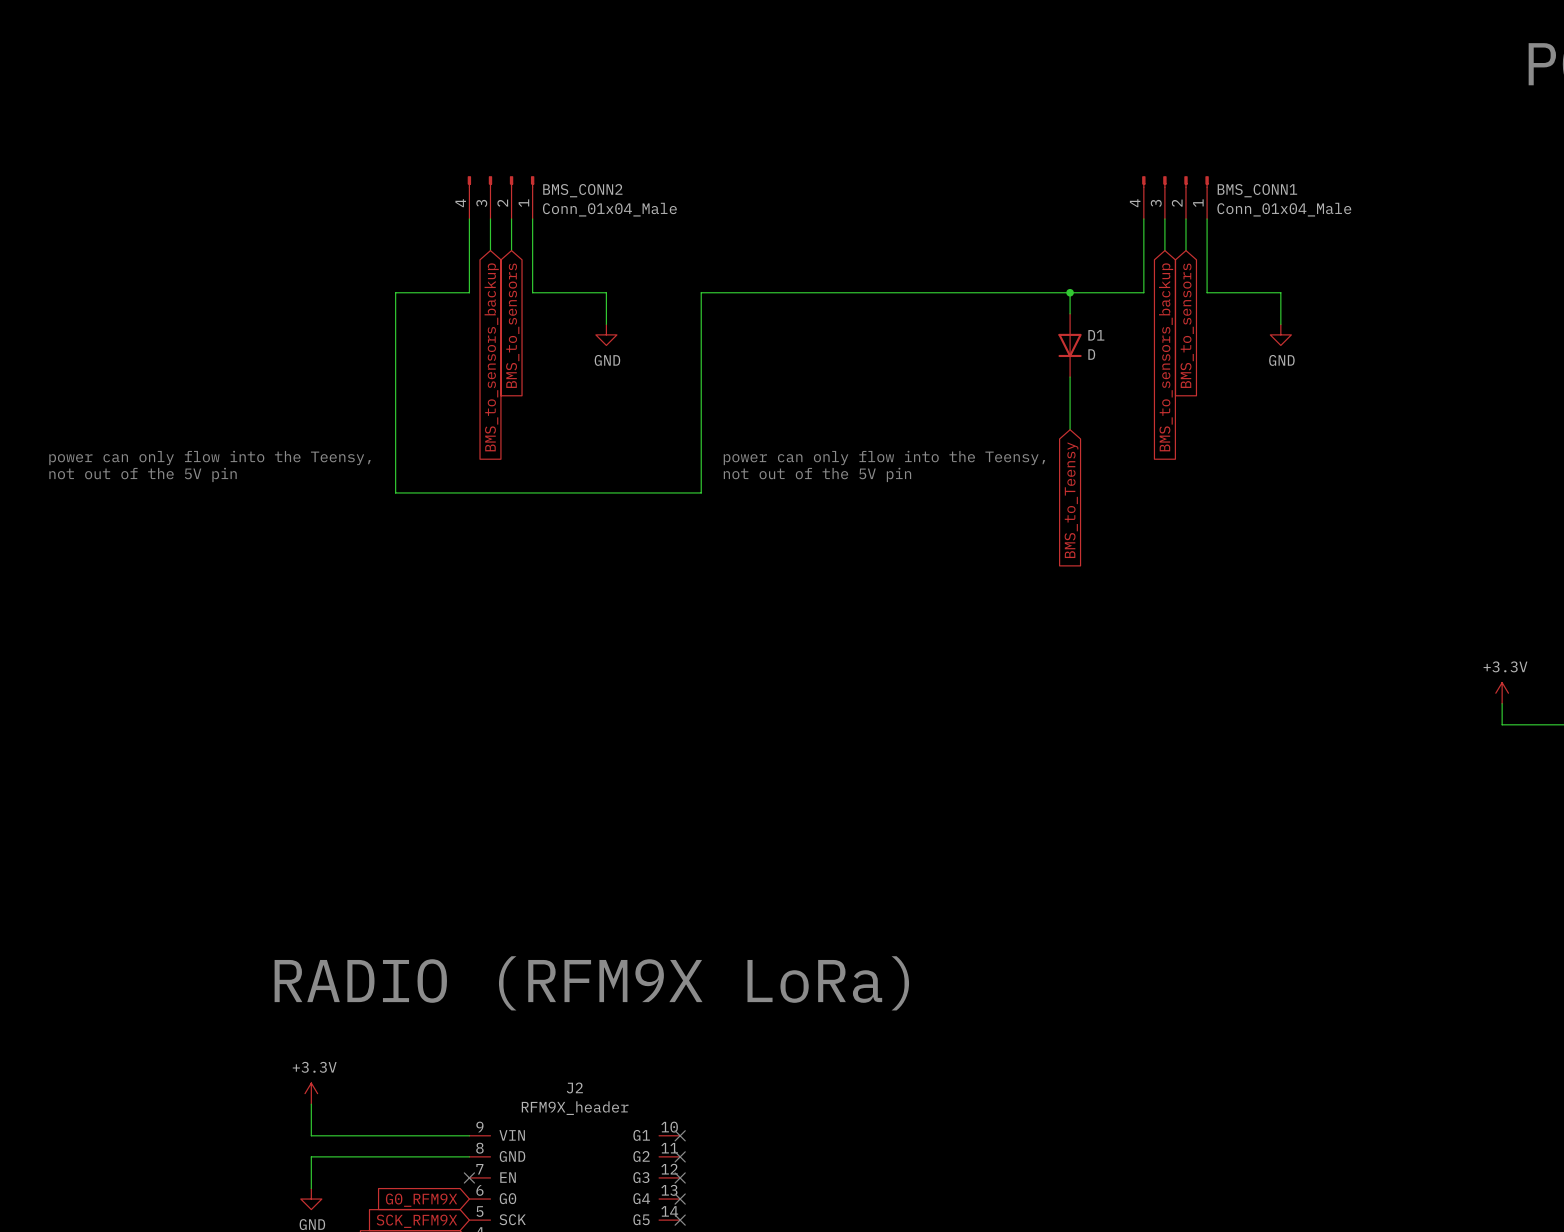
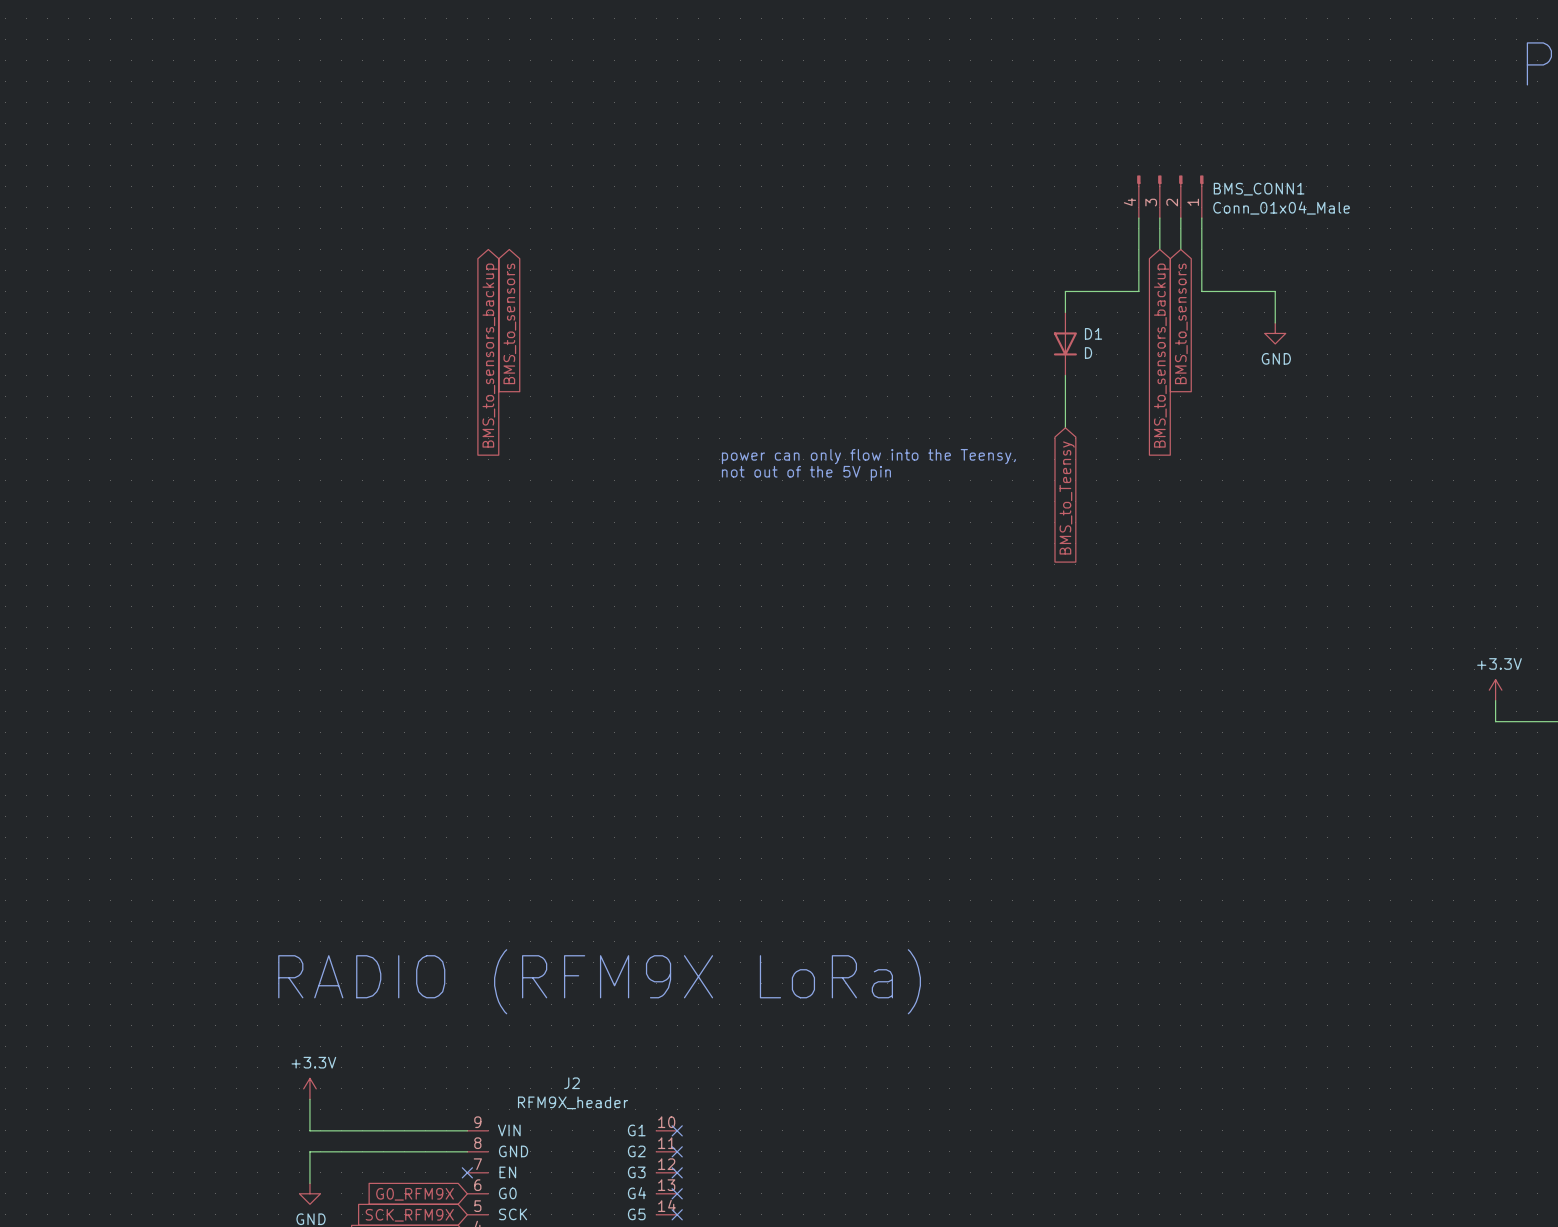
BMS_CONN2: Conn_01x04_Male (501, 197) -> none
wire: (469, 218) (469, 292) (395, 292) (395, 492) (701, 492) (701, 292) (1070, 292) -> none
wire: (490, 218) (490, 250) -> none
wire: (511, 218) (511, 250) -> none
wire: (532, 218) (532, 292) (606, 292) (606, 324) -> none
junction: (1070, 292) -> none
power symbol: GND (606, 334) -> none
text: power can only flow into the Teensy, (210, 457) -> none
text: not out of the 5V pin (143, 474) -> none

